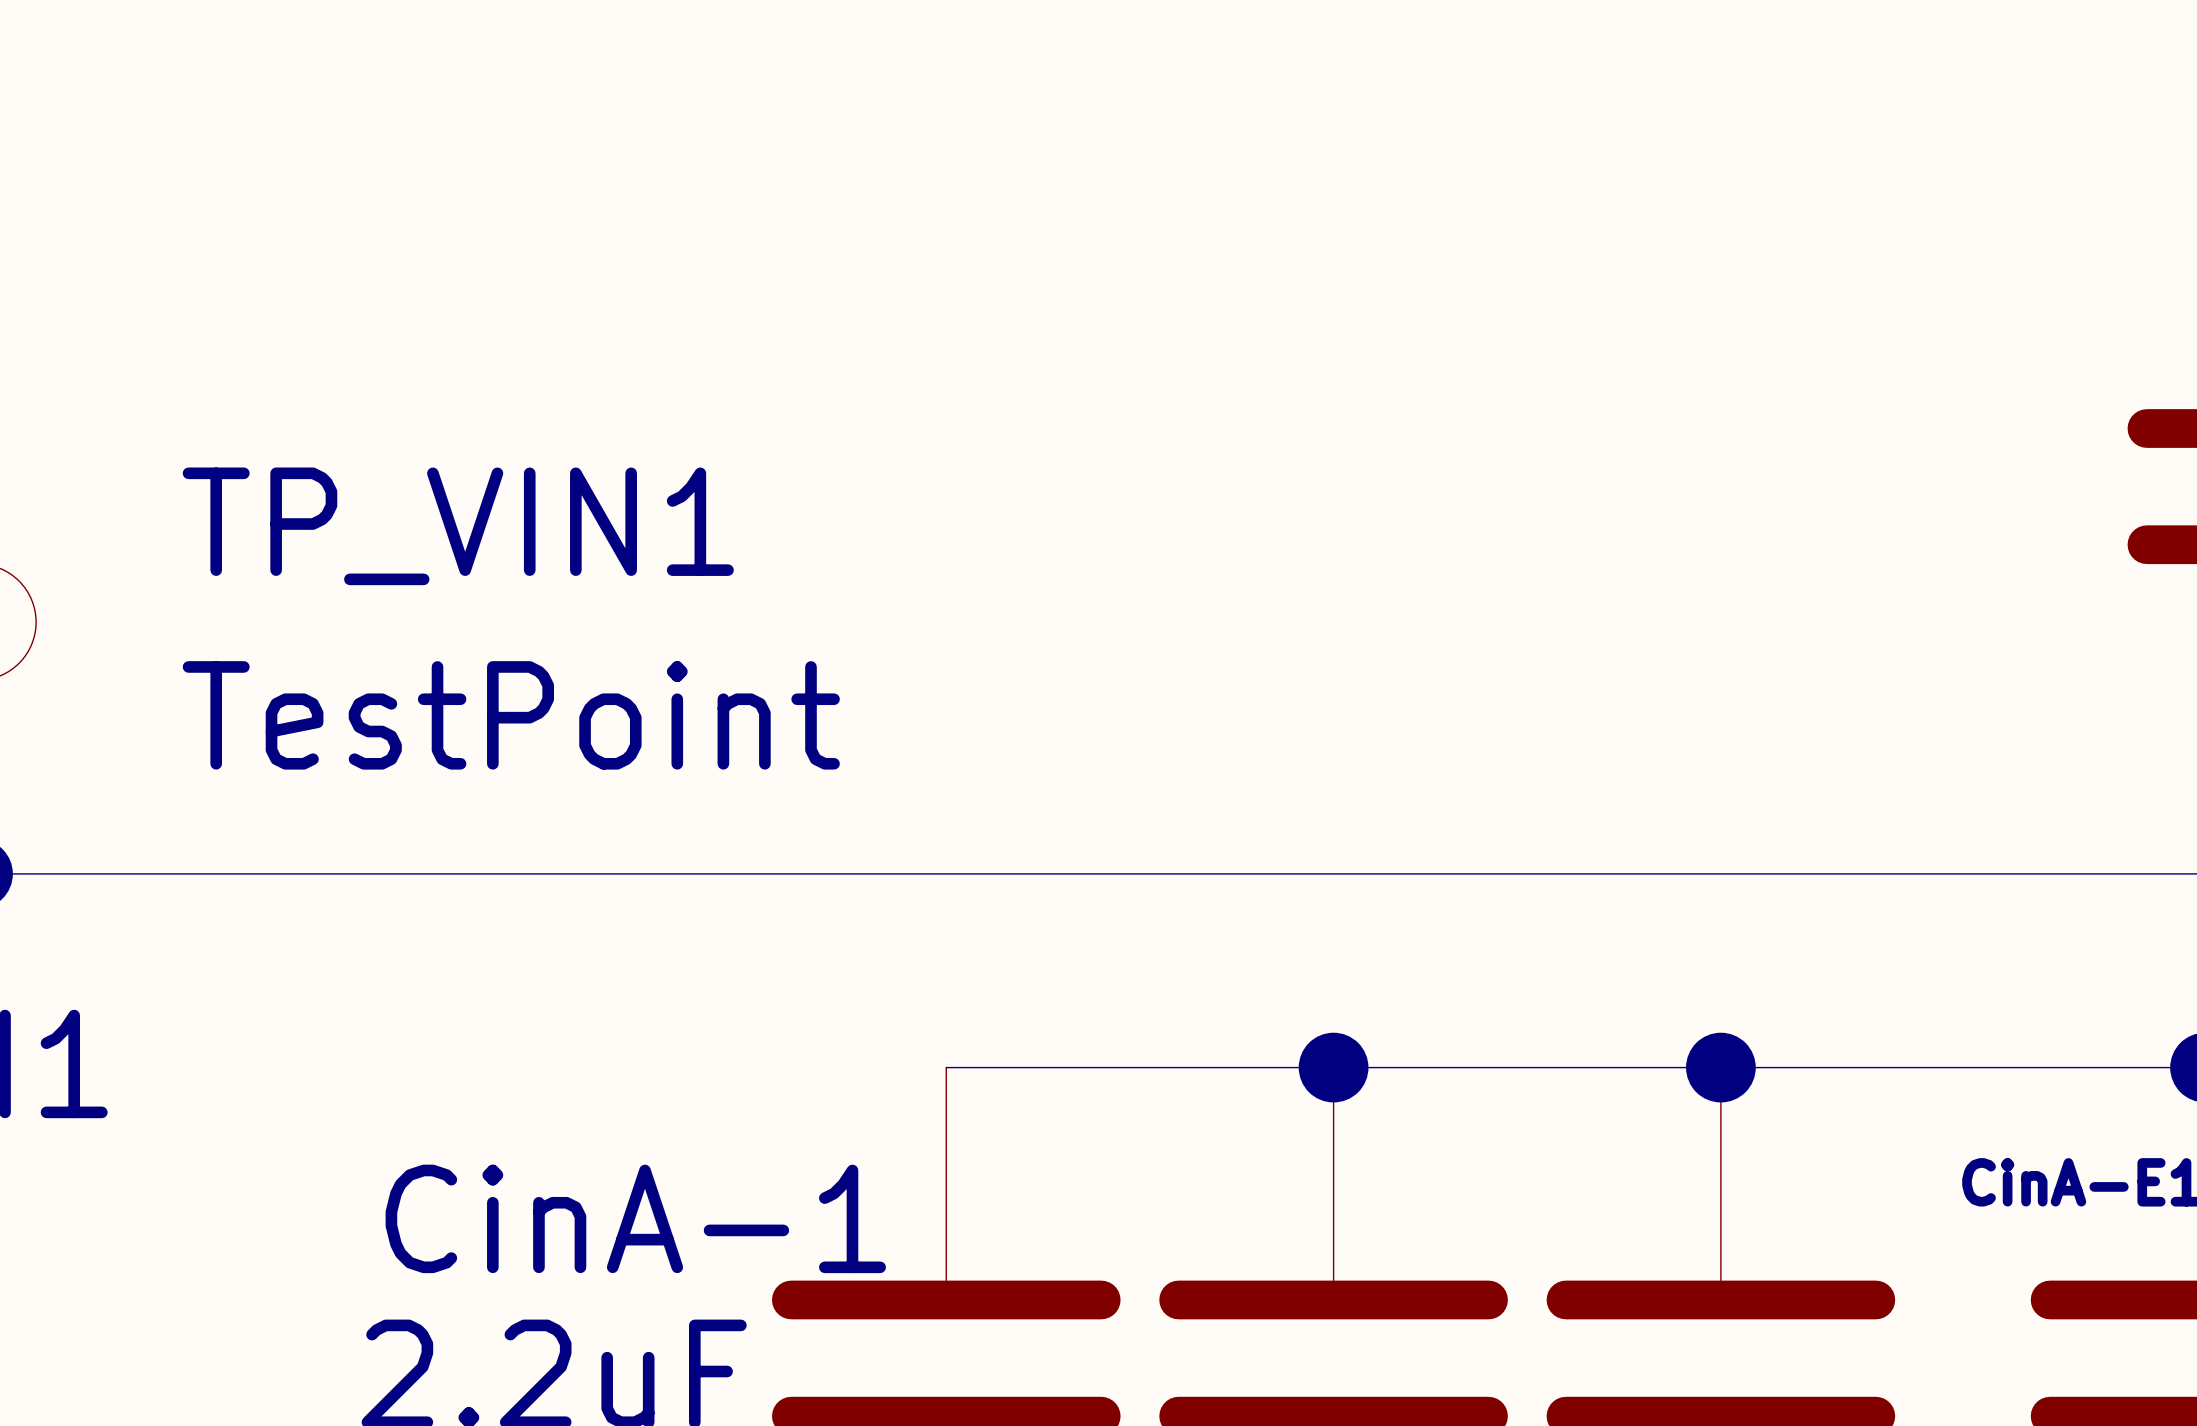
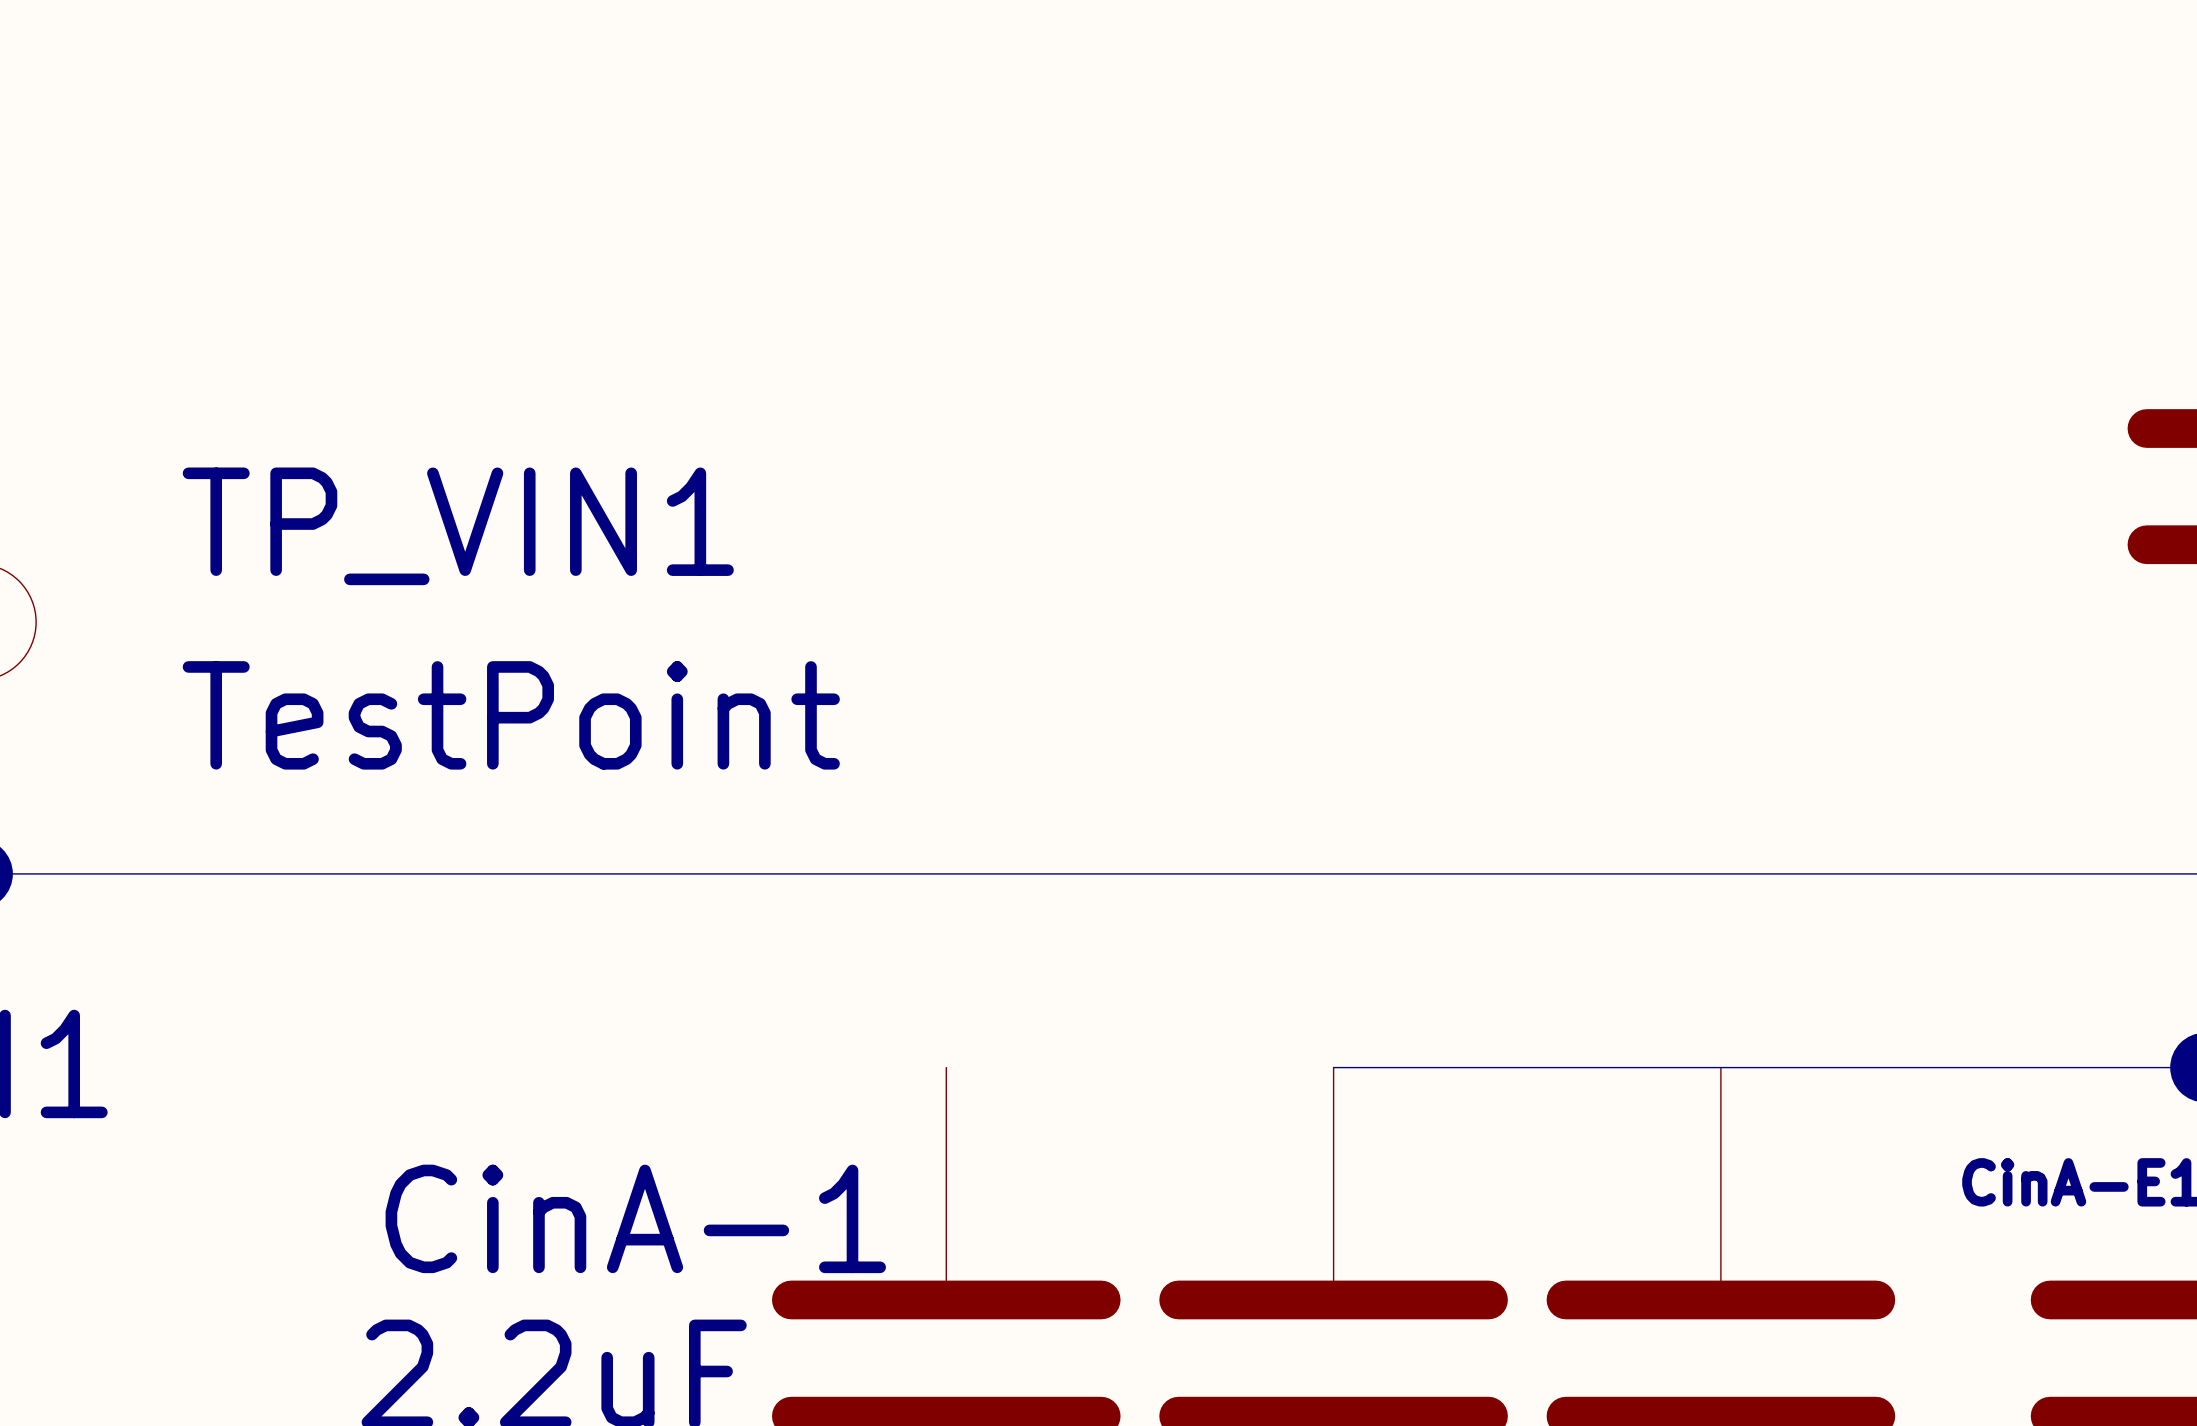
wire: (946, 1067) (1333, 1067) -> none
junction: (1333, 1067) -> none
junction: (1720, 1067) -> none

